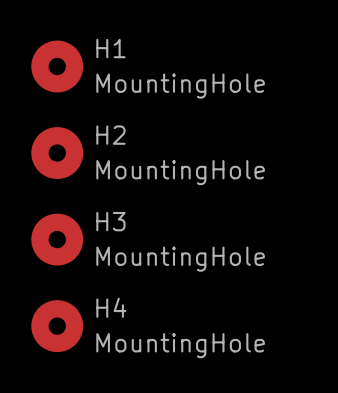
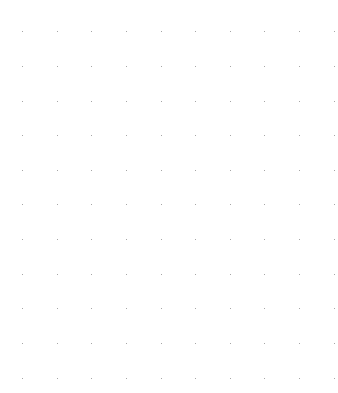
H1: MountingHole (57, 66) -> none
H2: MountingHole (57, 153) -> none
H3: MountingHole (57, 239) -> none
H4: MountingHole (57, 326) -> none

